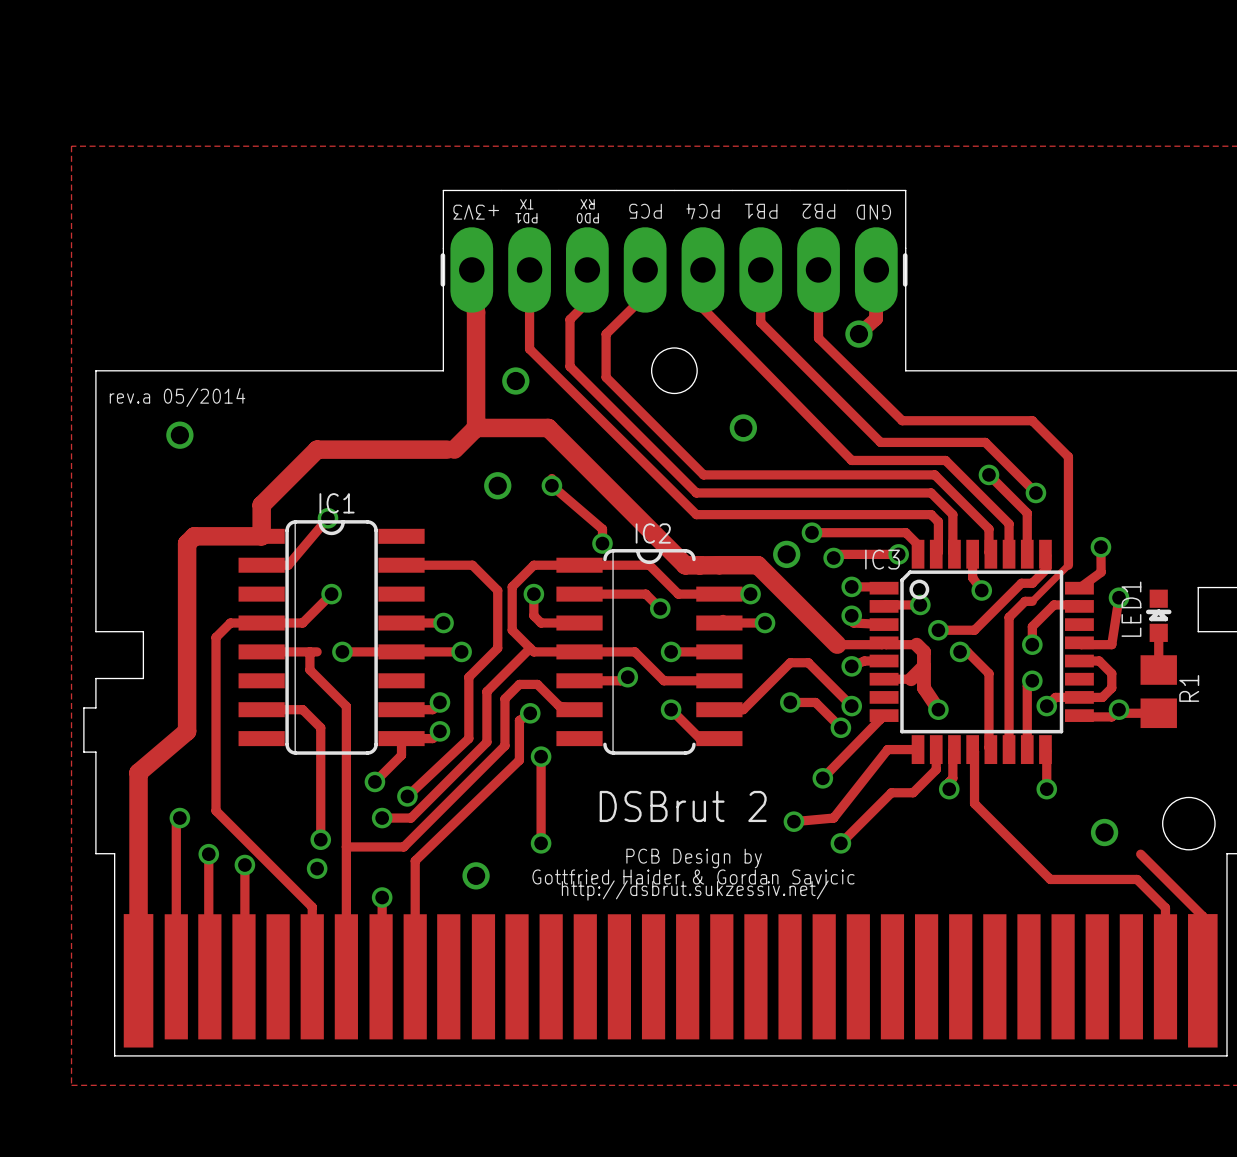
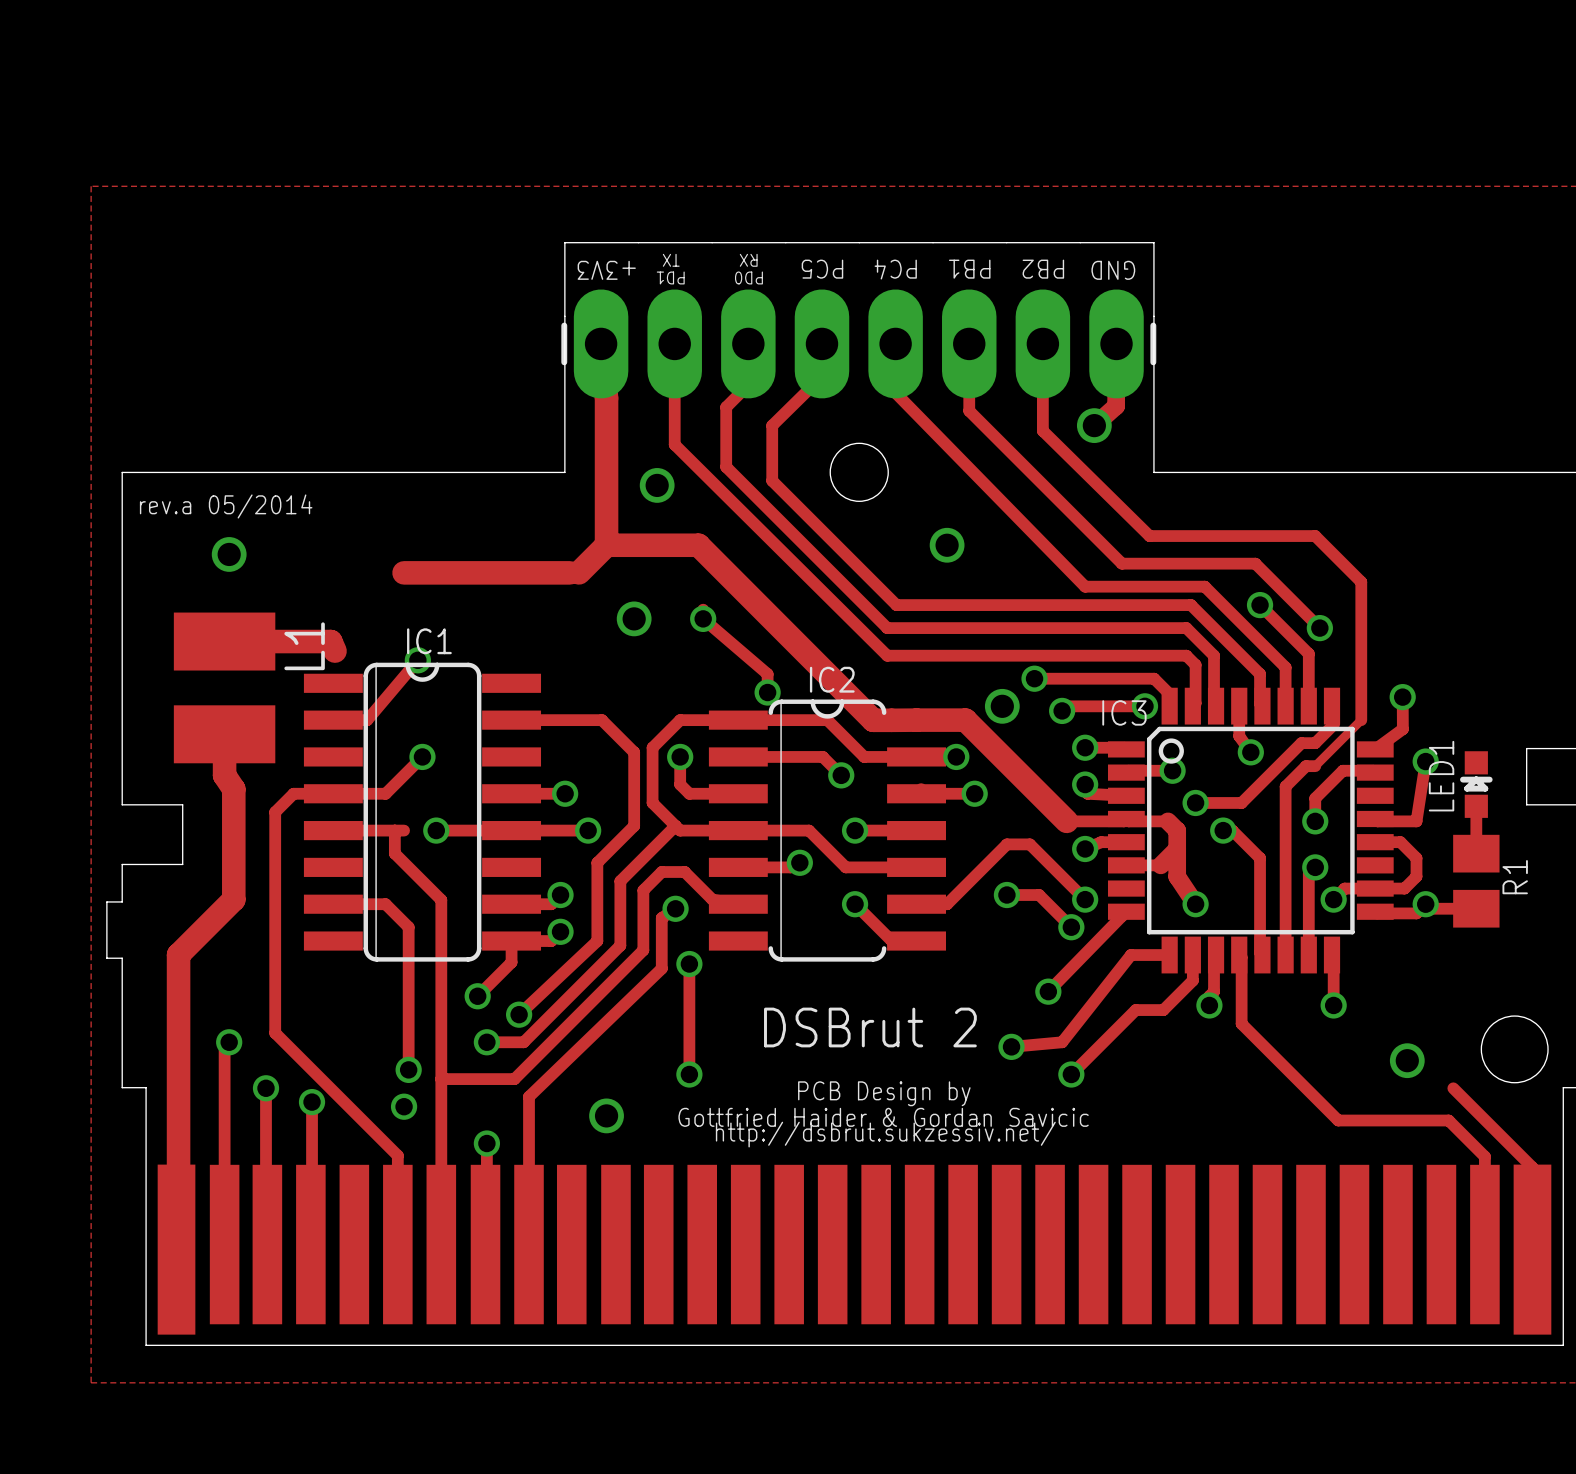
track: (317, 449) (261, 505) (261, 536) (194, 536) (187, 543) (187, 731) (138, 772) (138, 980) -> (224, 734) (224, 775) (233, 789) (233, 899) (178, 954) (178, 1247) (176, 1249)
track: none -> (224, 641) (330, 641) (335, 651)
L1: none -> (224, 687)

